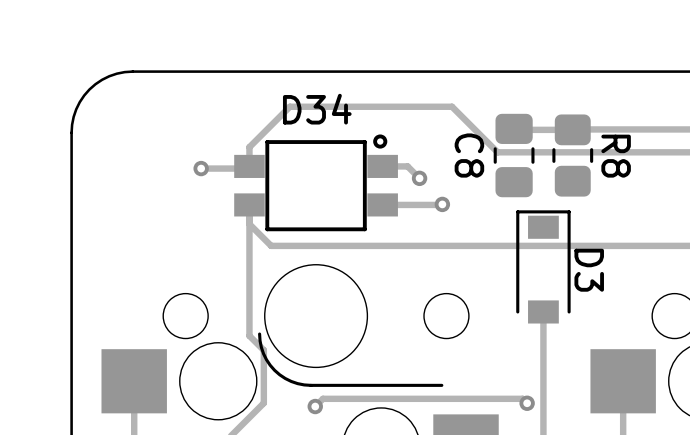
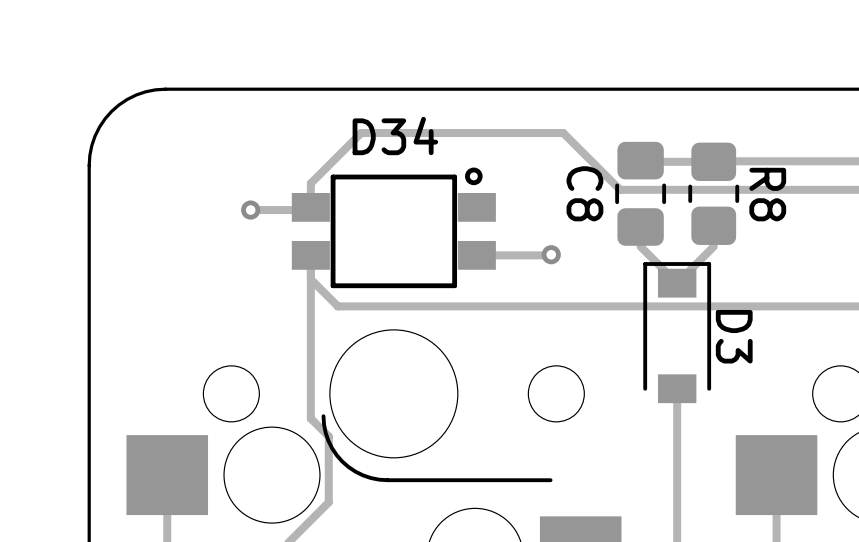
track: (382, 166) (407, 166) (419, 178) -> none
via: (419, 178) -> none
track: none -> (713, 246) (677, 283) (640, 246)
track: (527, 403) (522, 398) (322, 398) (315, 406) -> none
via: (527, 403) -> none
via: (315, 406) -> none

